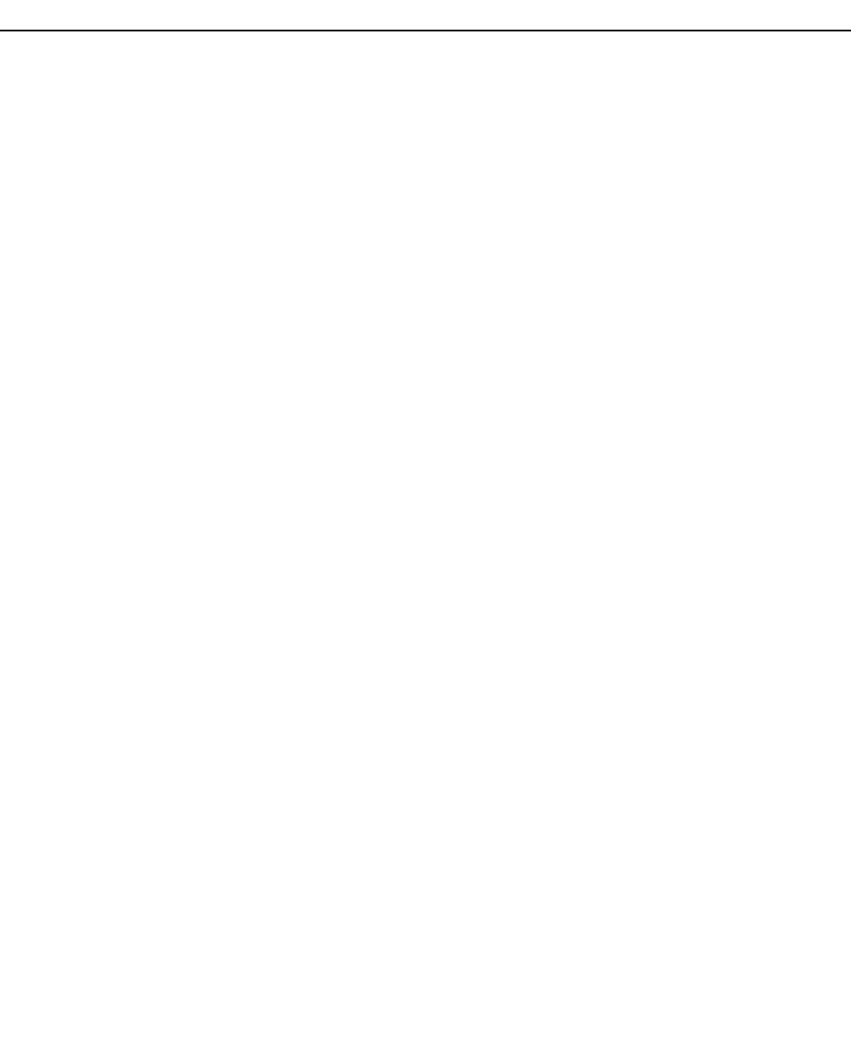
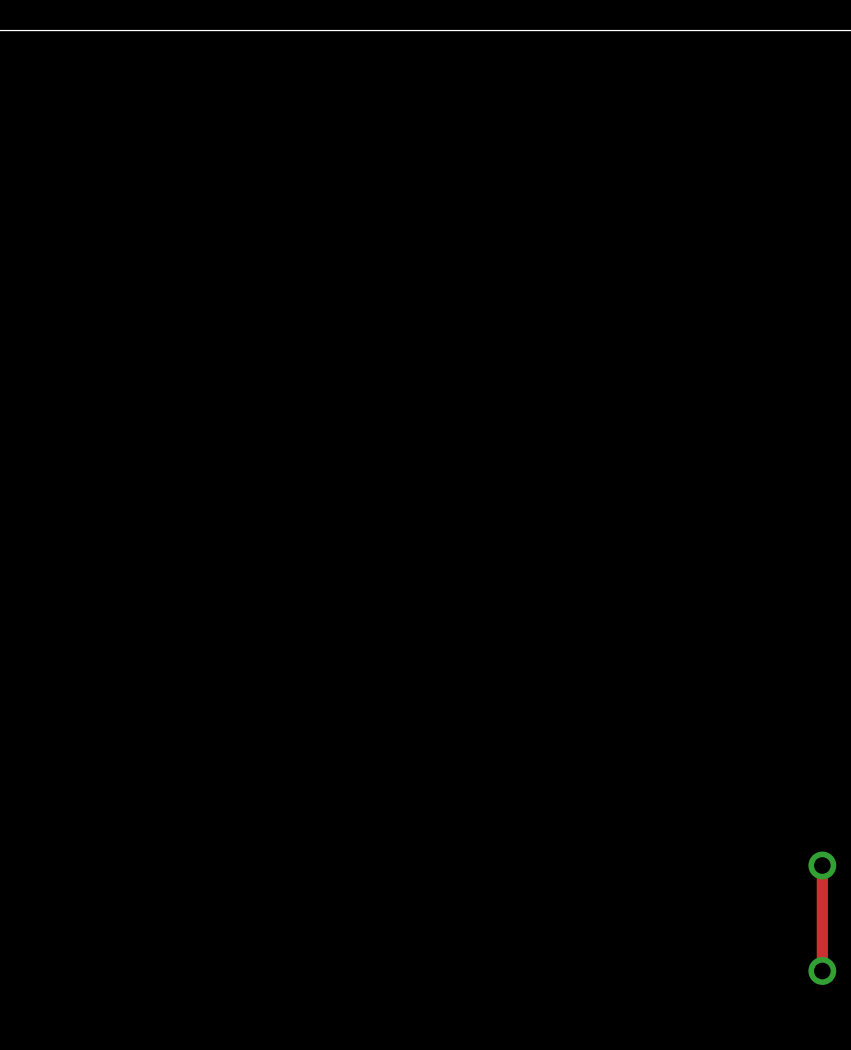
track: none -> (822, 865) (822, 971)
via: none -> (822, 865)
via: none -> (822, 971)

